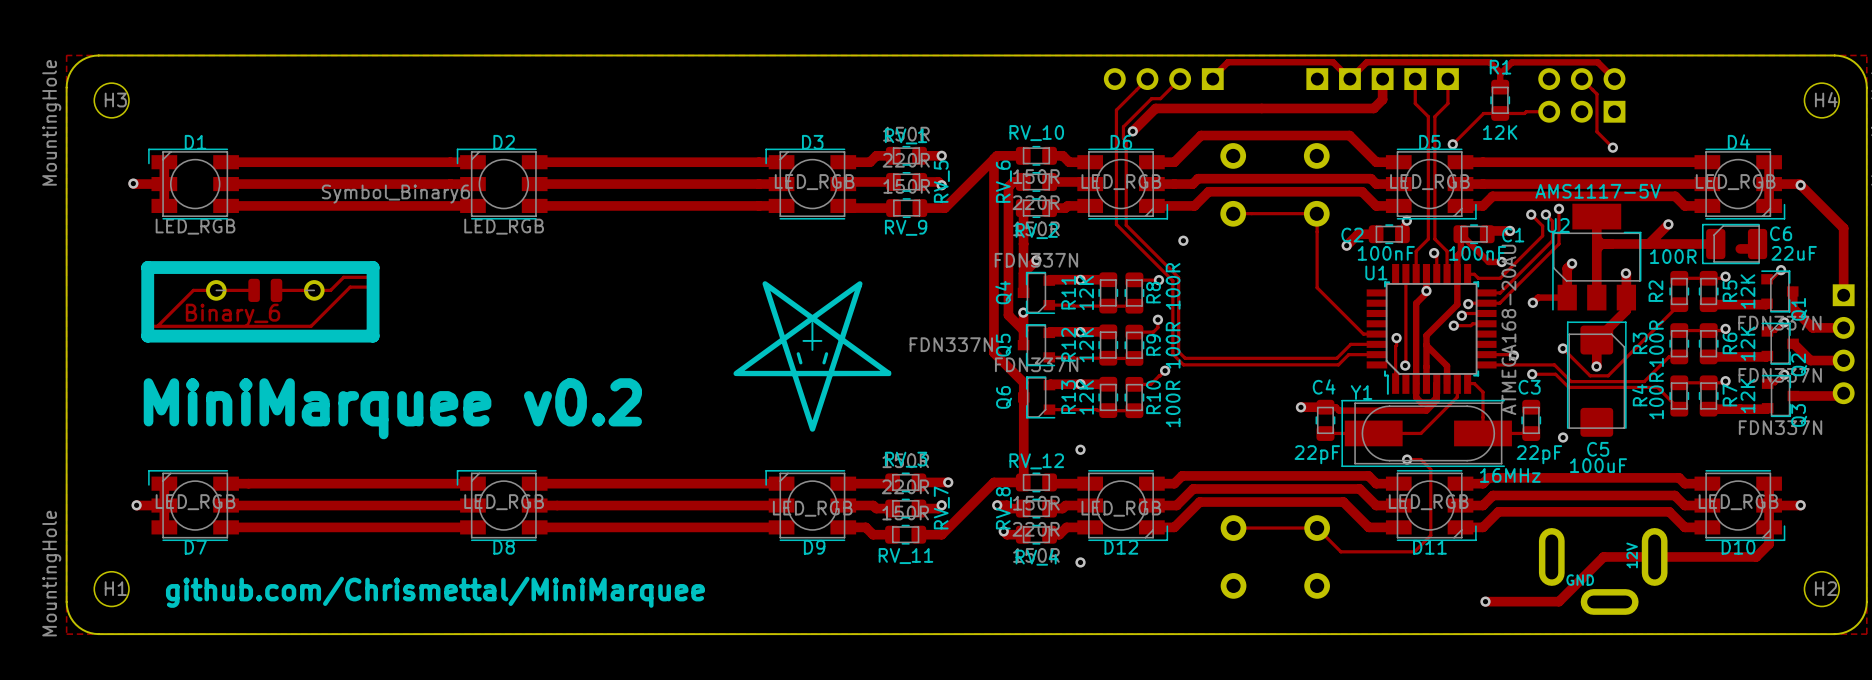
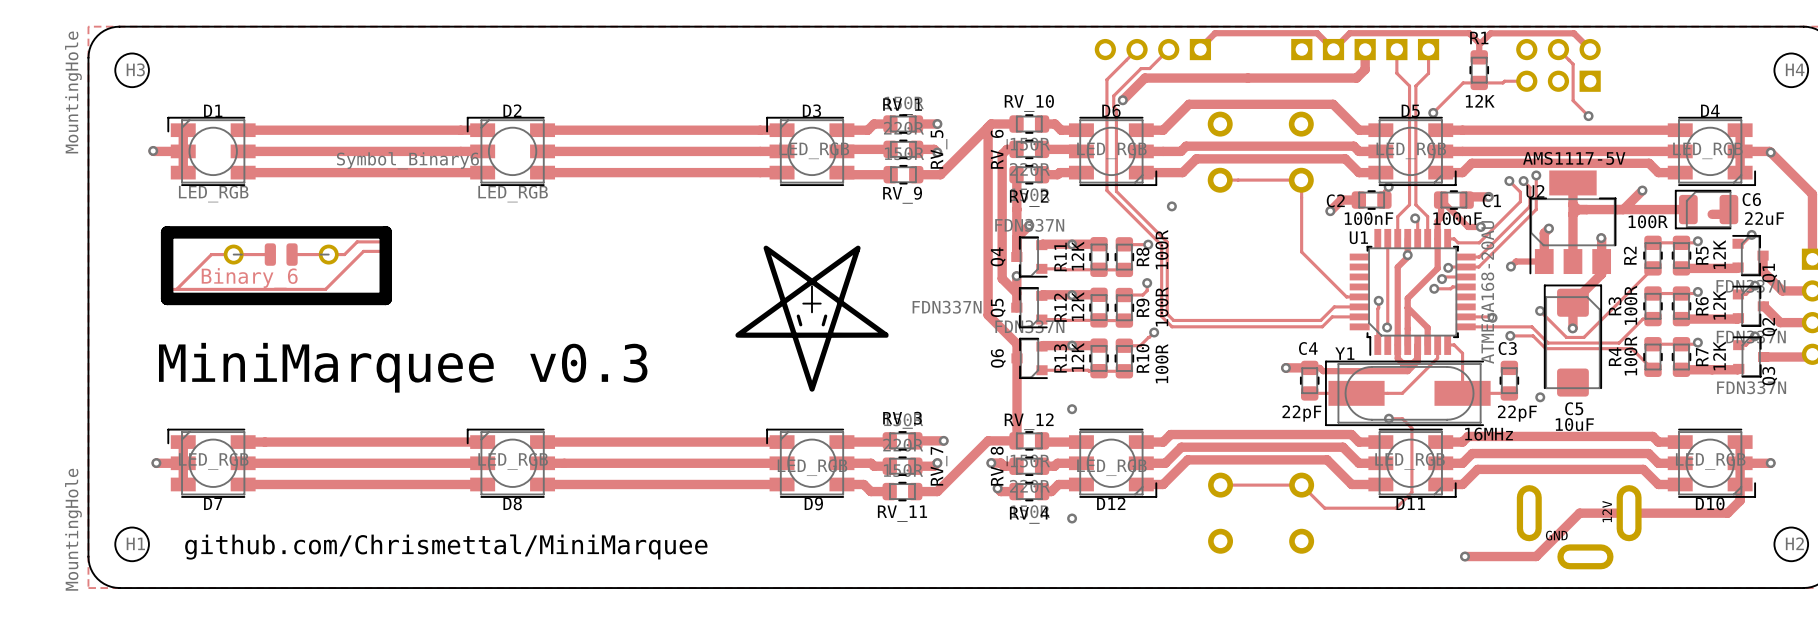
text: MiniMarquee v0.2 (392, 408) -> MiniMarquee v0.3 (403, 367)
C5 value: 100uF (1598, 465) -> 10uF (1574, 424)

